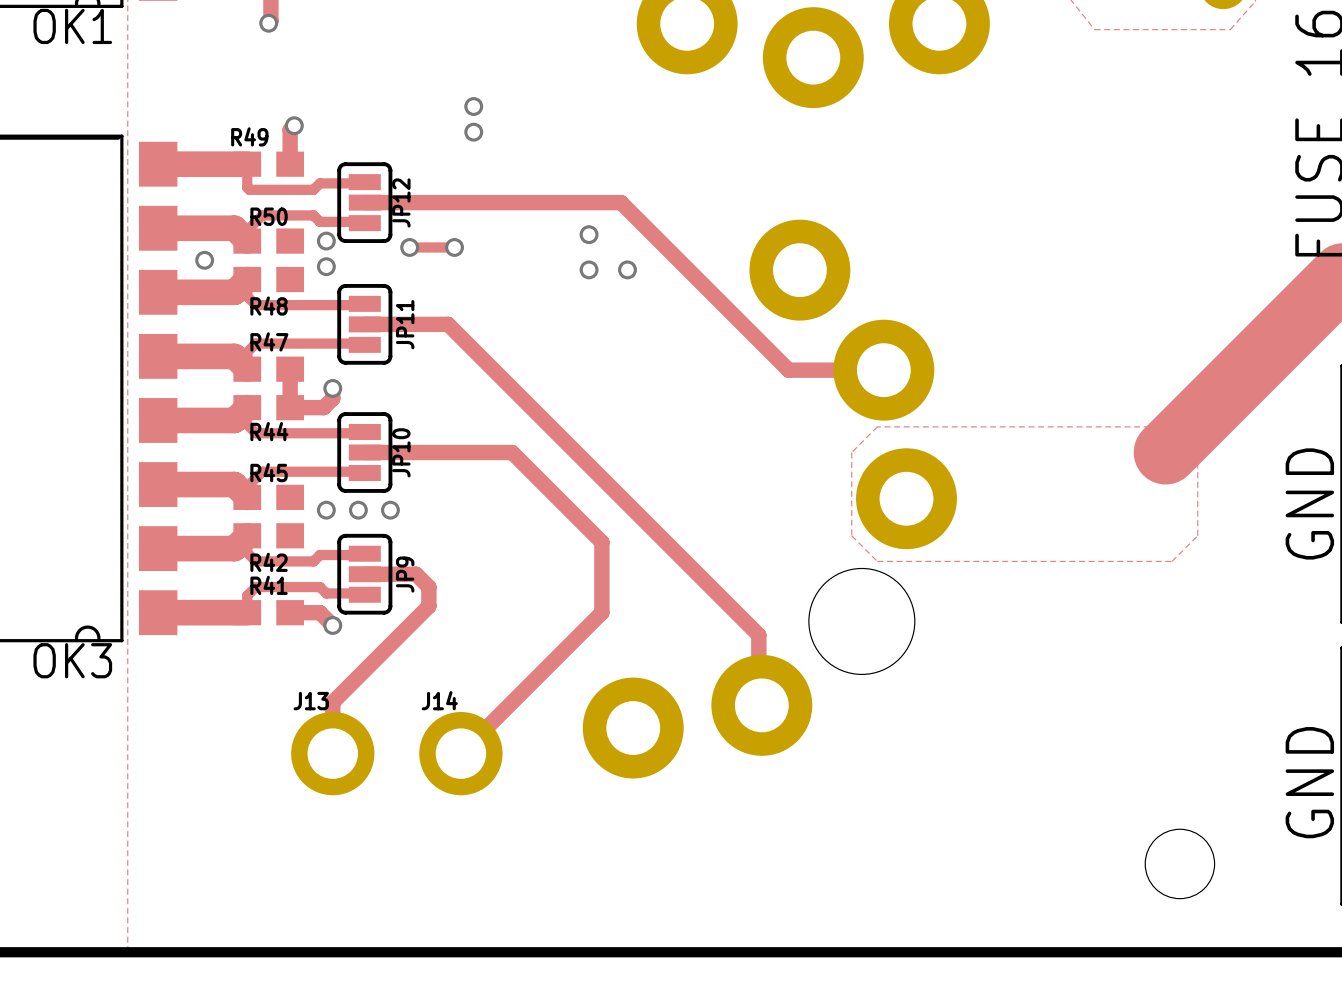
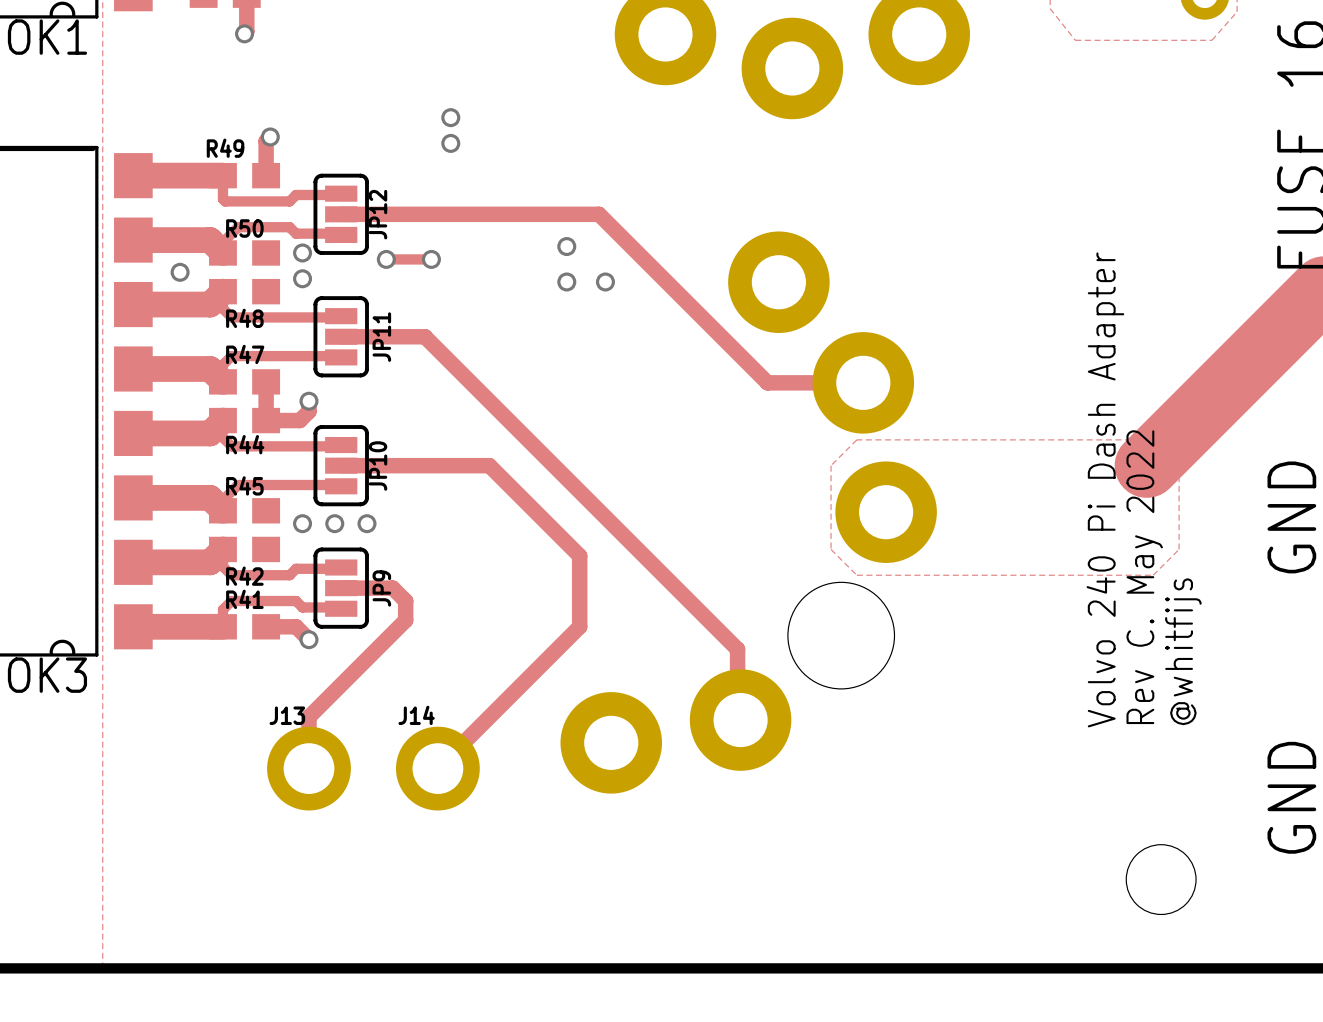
text: none -> Volvo 240 Pi Dash Adapter (1105, 489)
text: none -> Rev C. May 2022 (1144, 577)
text: none -> @whitfijs (1183, 651)

